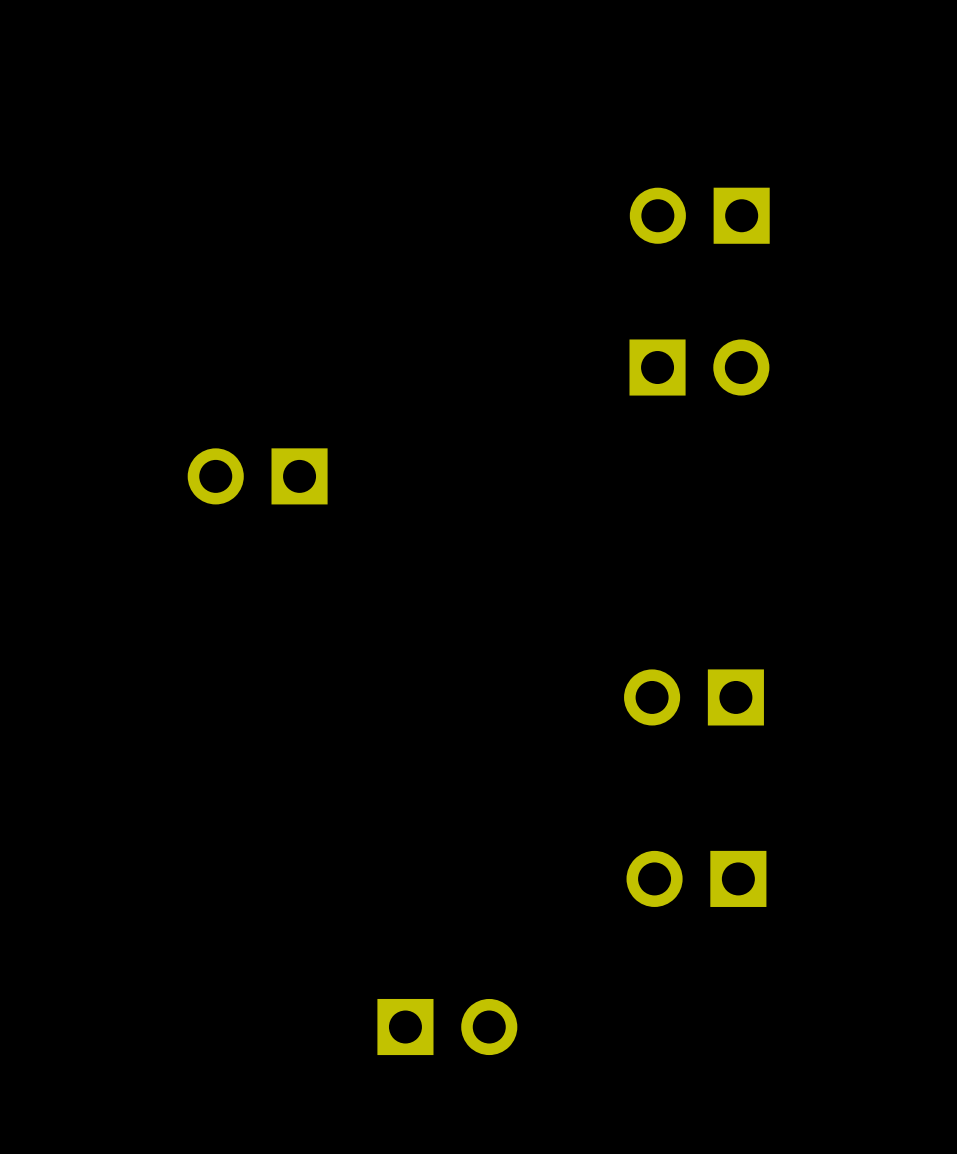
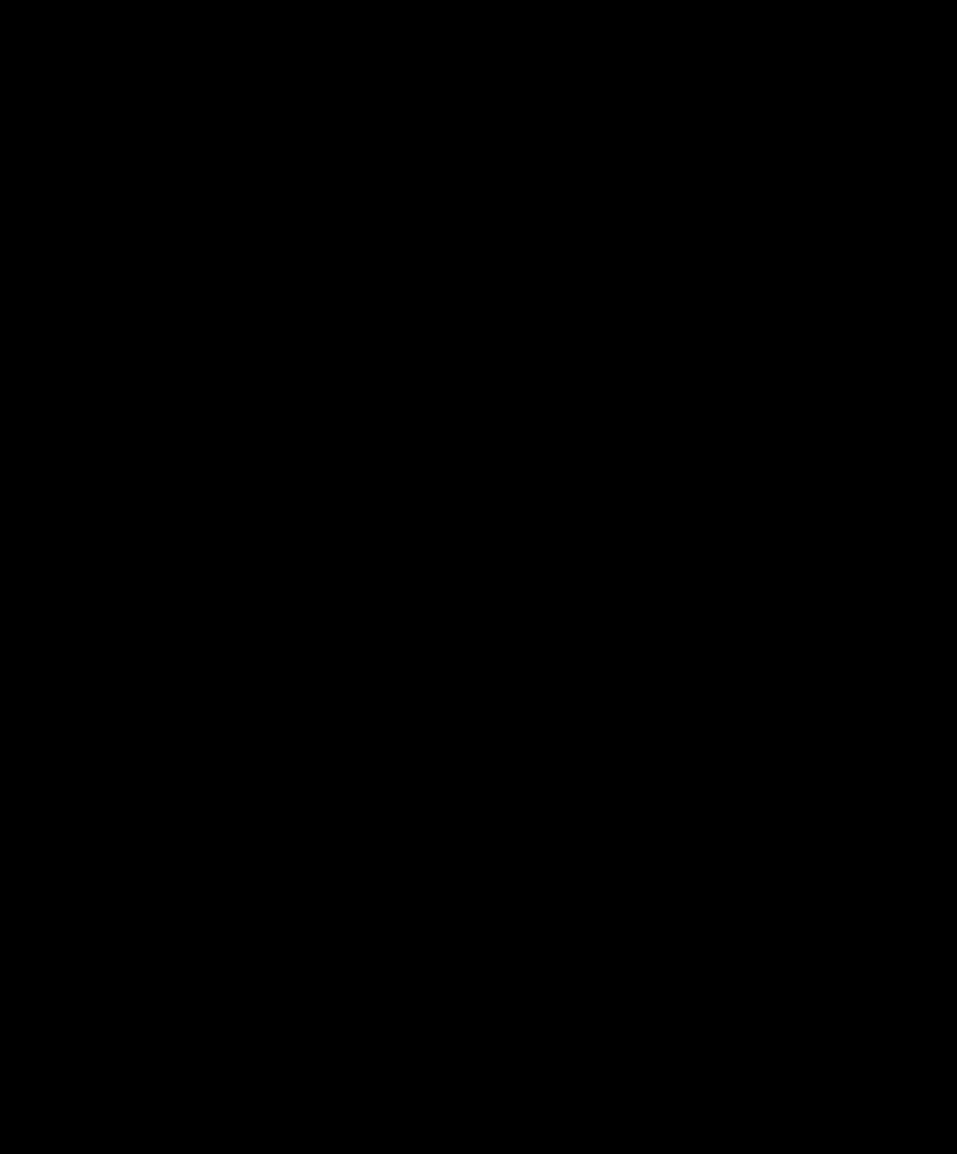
part: (699, 215) -> none
part: (699, 367) -> none
part: (257, 476) -> none
part: (693, 697) -> none
part: (696, 878) -> none
part: (447, 1027) -> none

